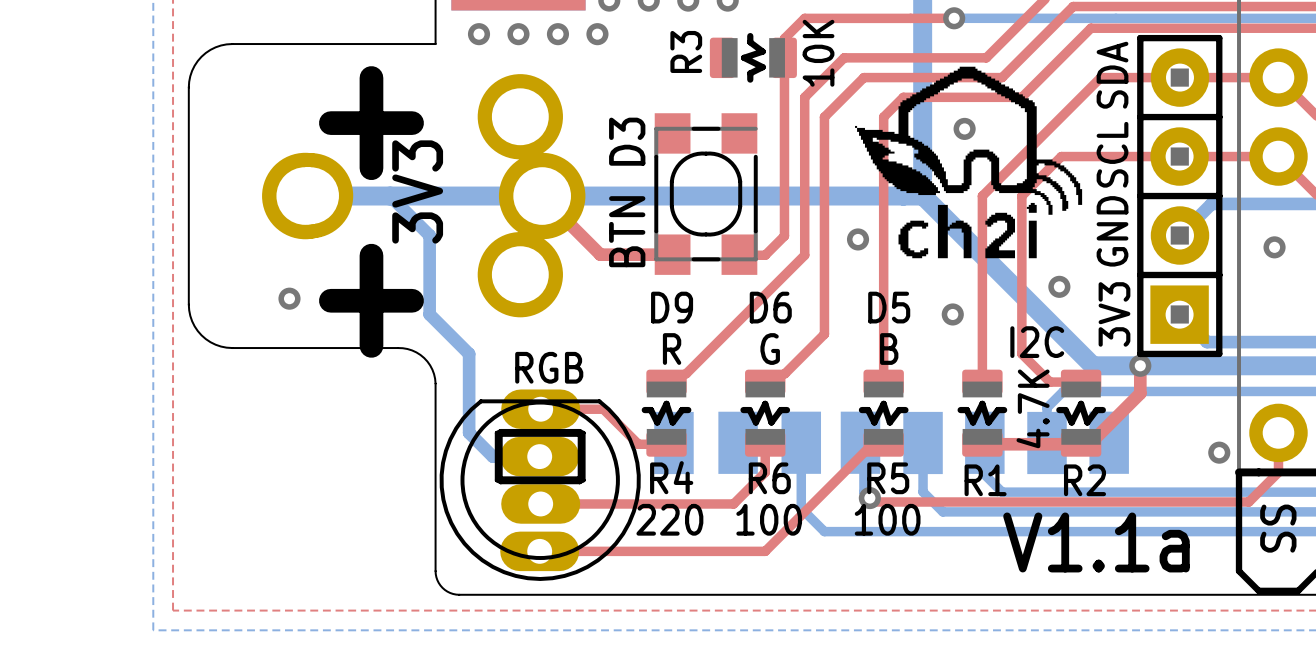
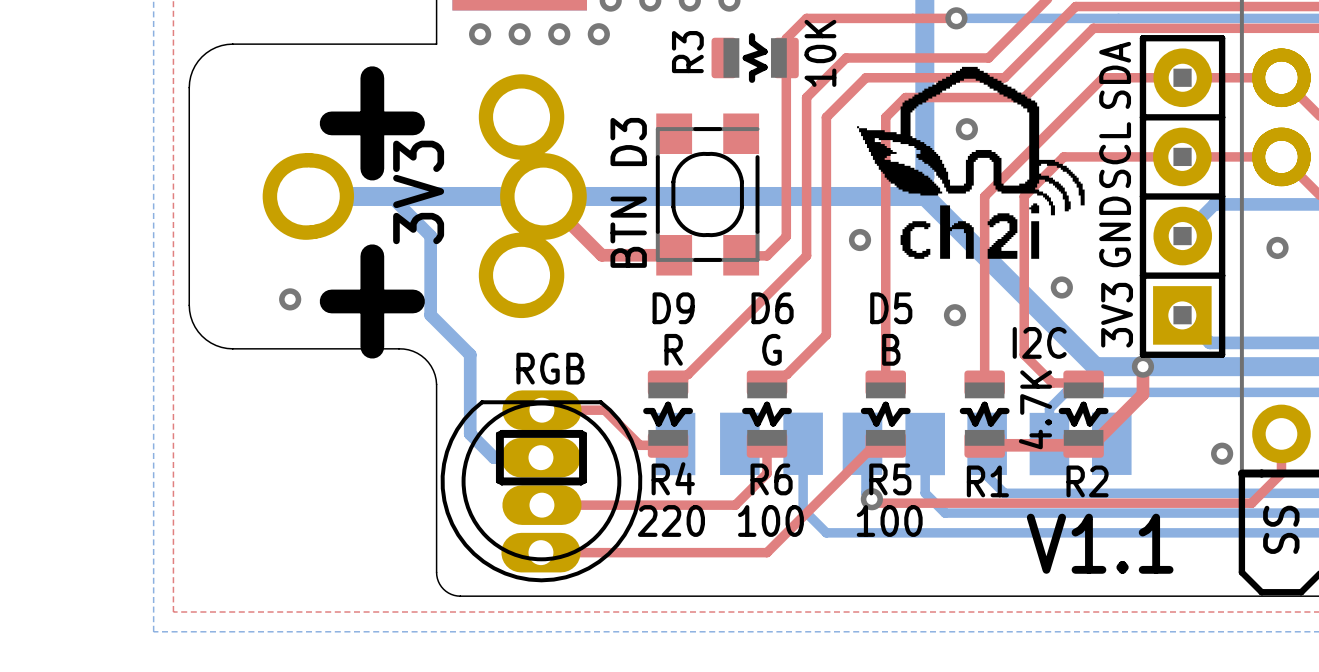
part: none -> (1281, 77)
part: none -> (1281, 156)
text: V1.1a (1096, 542) -> V1.1 (1100, 543)

